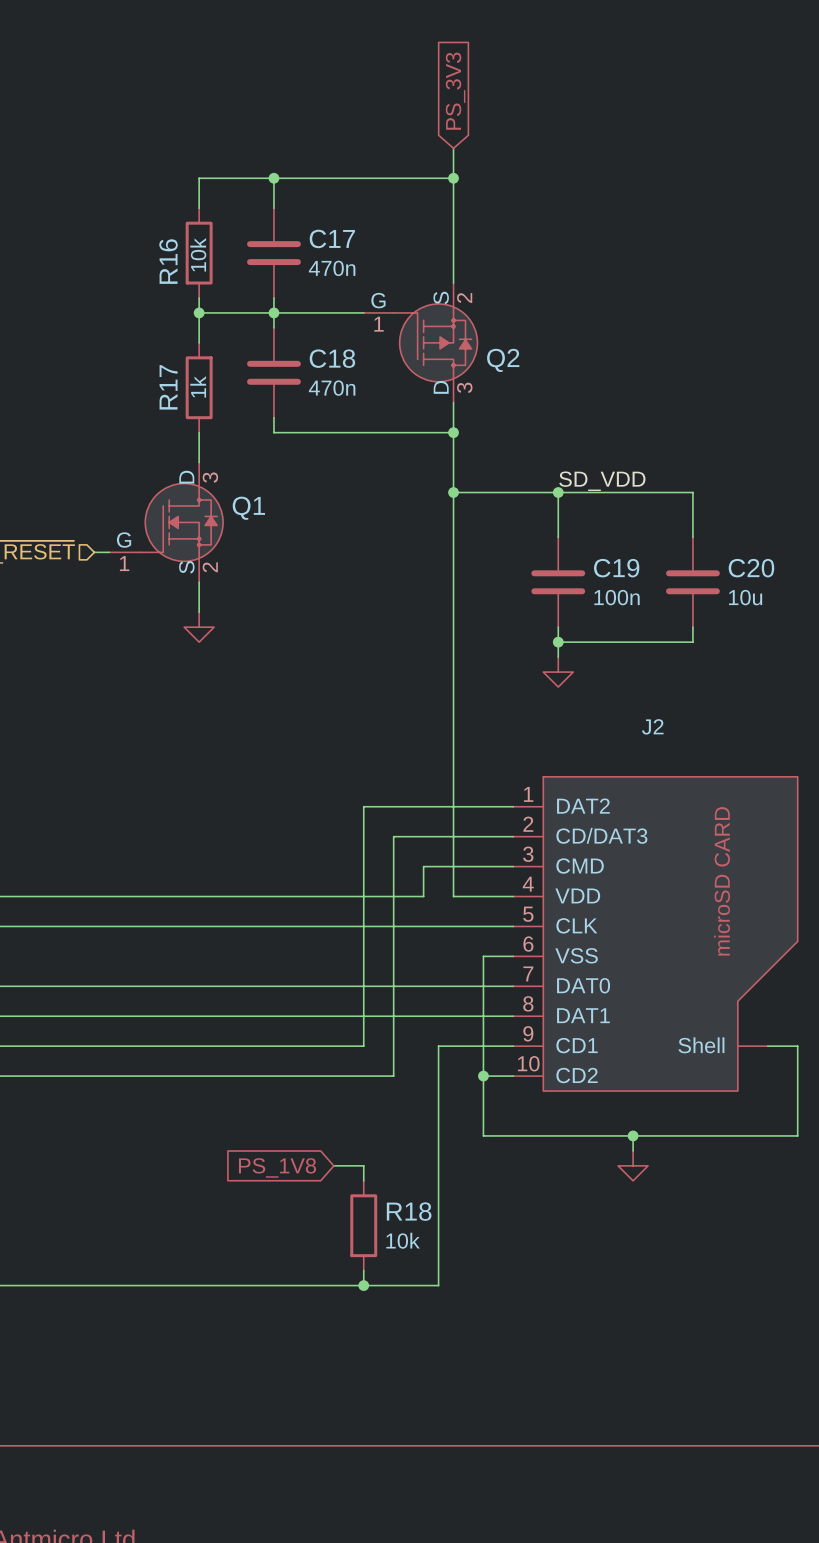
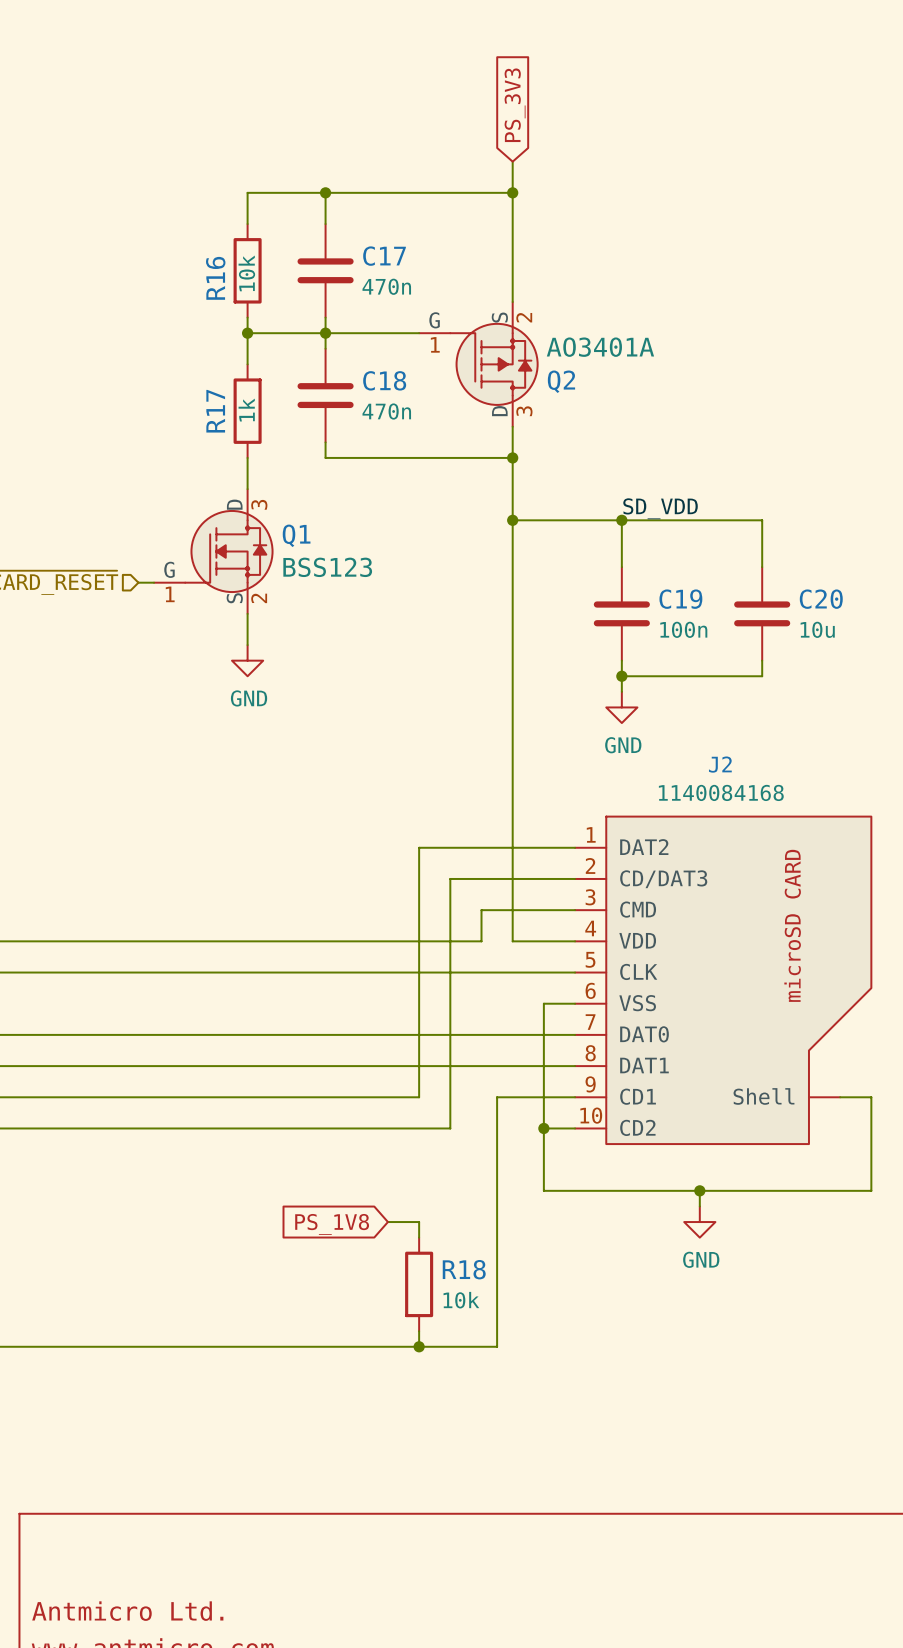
Q2 value: none -> AO3401A (600, 347)
Q1 value: none -> BSS123 (327, 567)
power symbol text: none -> GND (249, 698)
power symbol text: none -> GND (623, 745)
J2 value: none -> 1140084168 (721, 792)
power symbol text: none -> GND (701, 1259)

